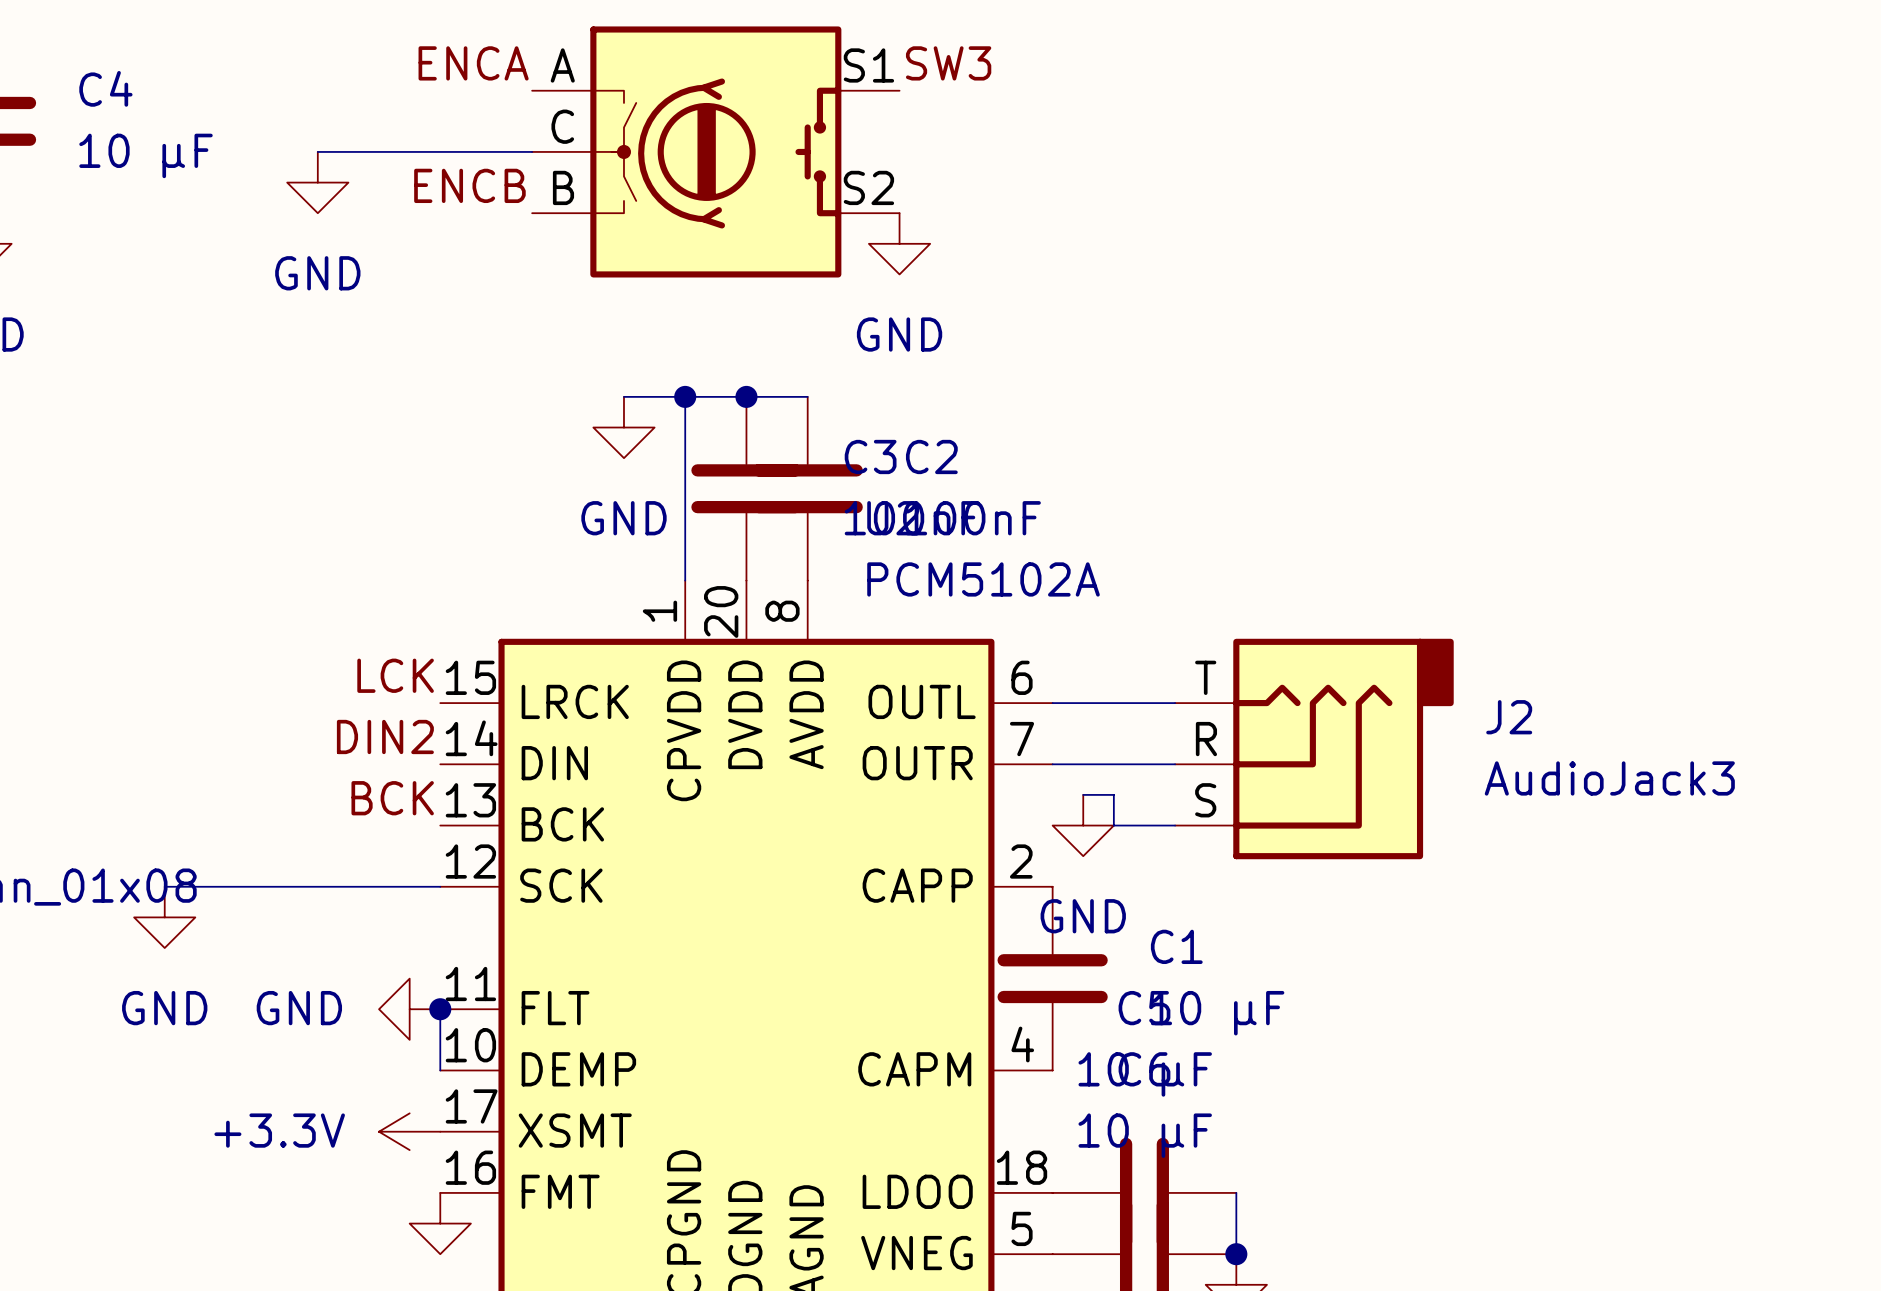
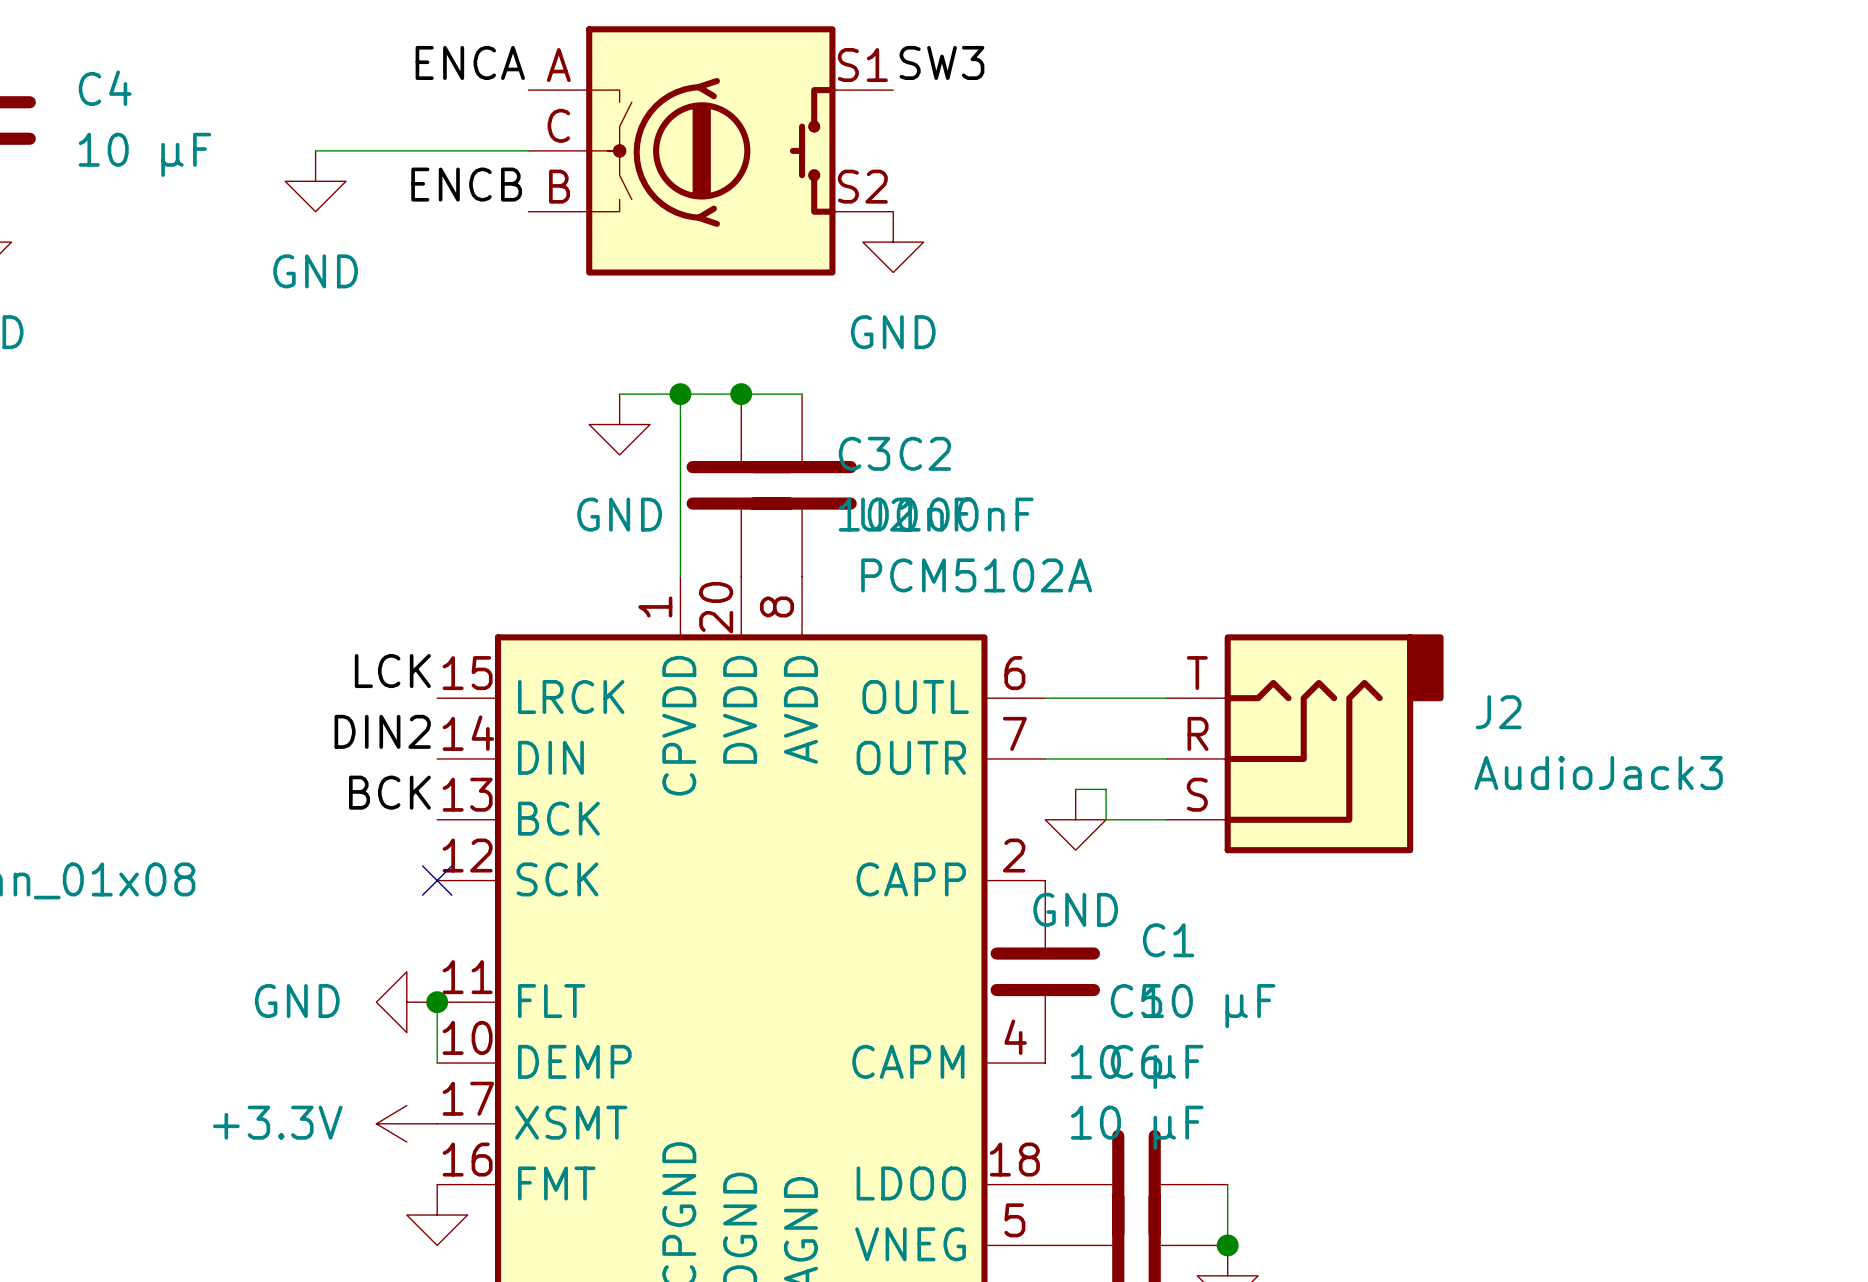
wire: (164, 886) (440, 886) -> none
no-connect mark: none -> (437, 880)
power symbol: GND (164, 917) -> none

